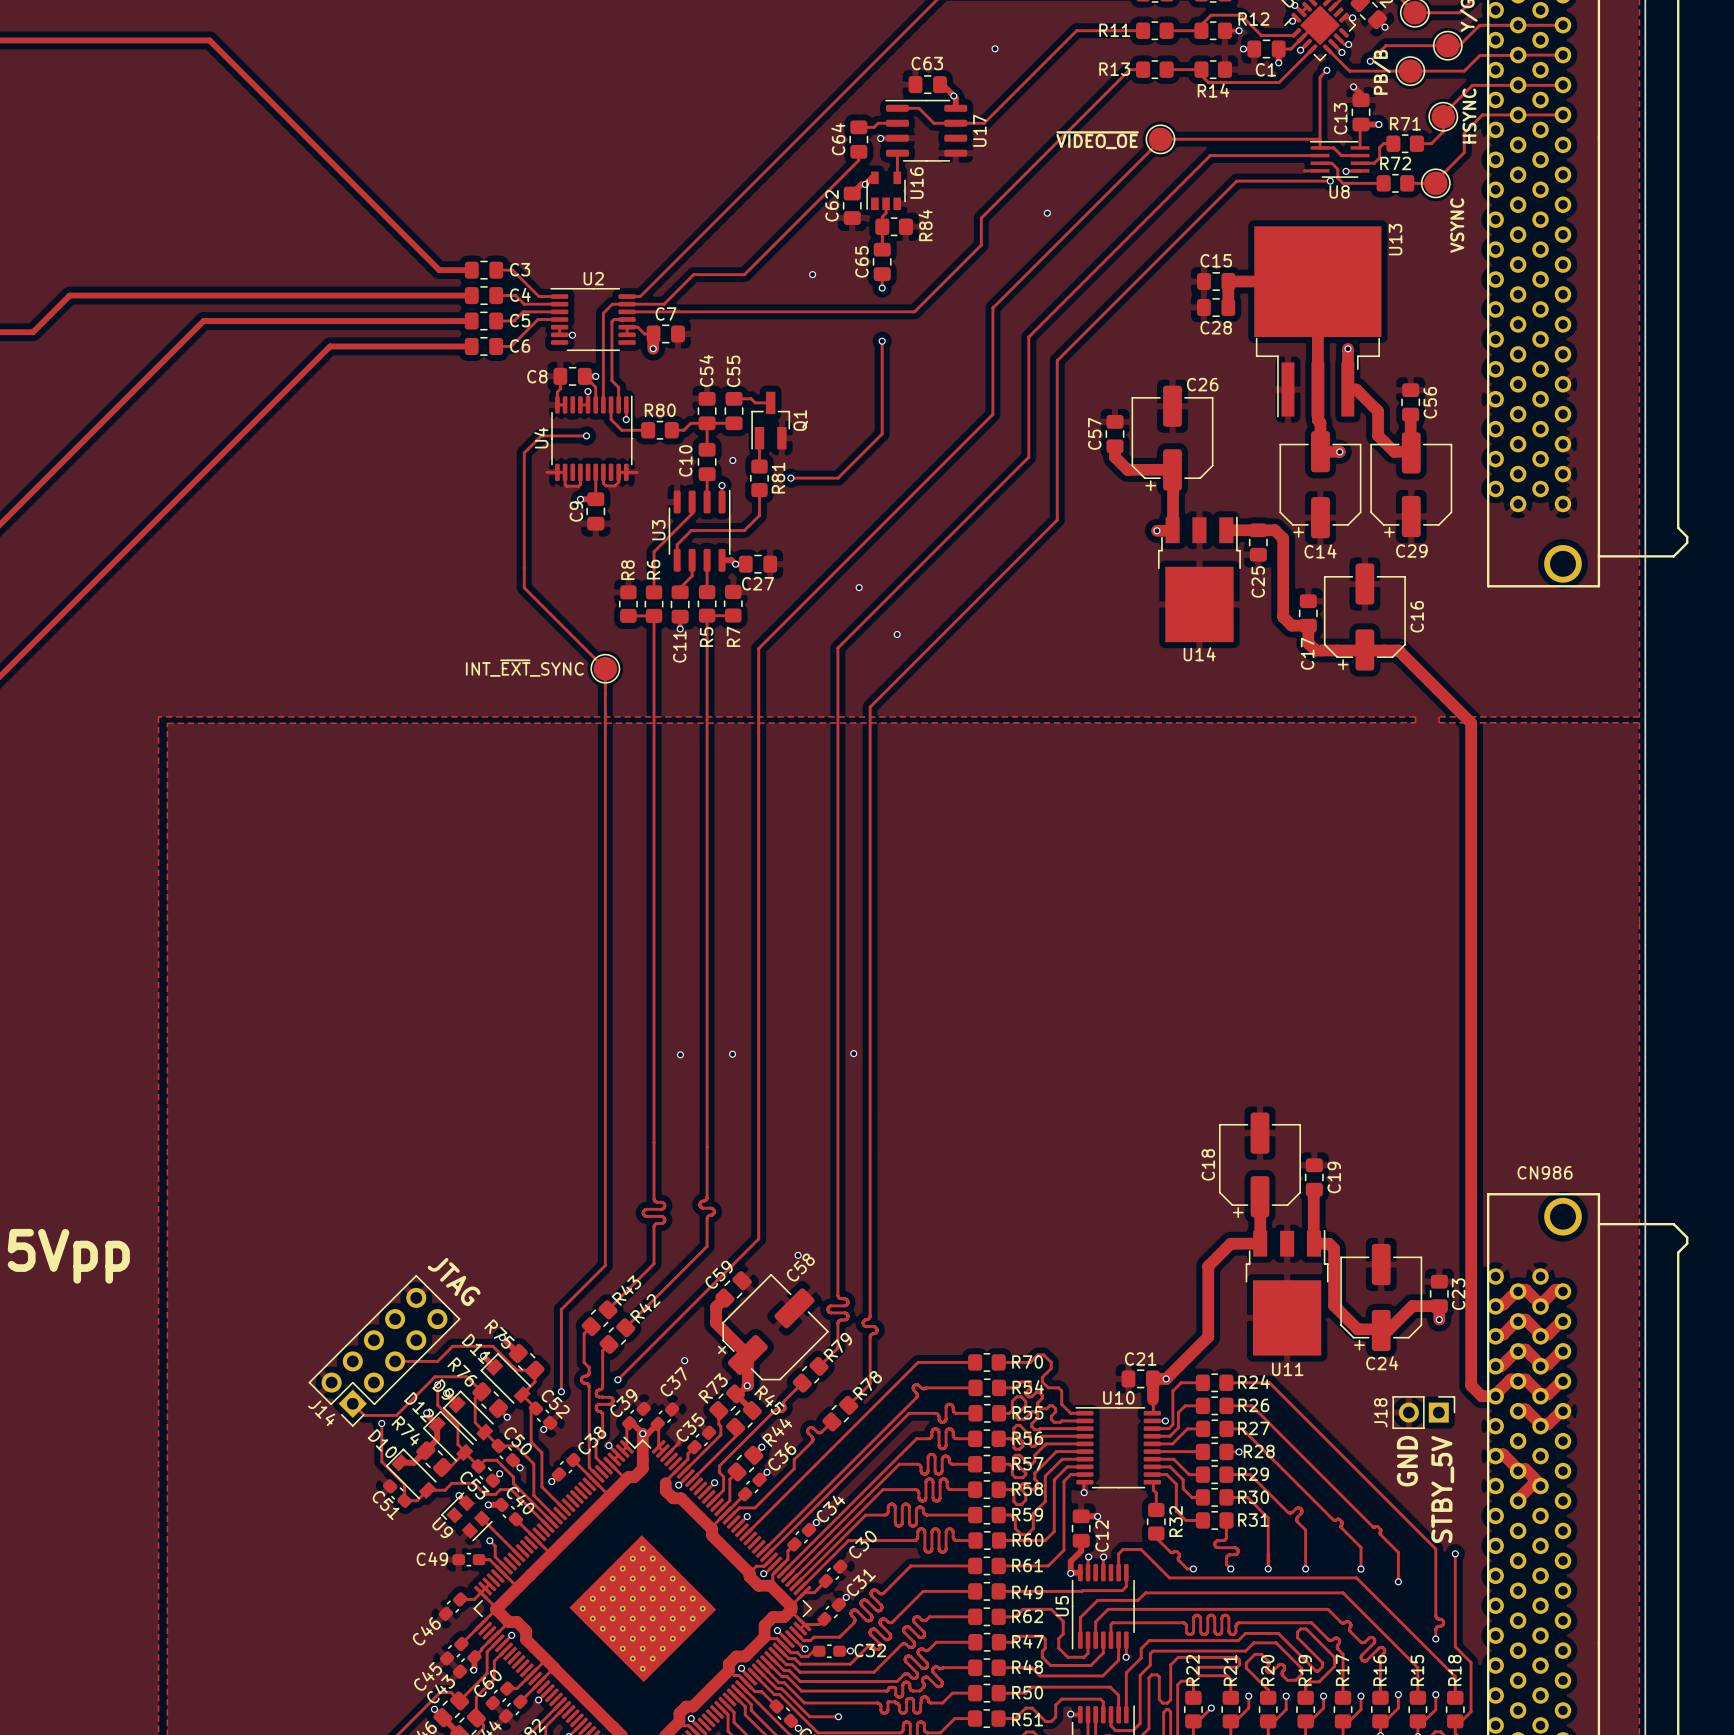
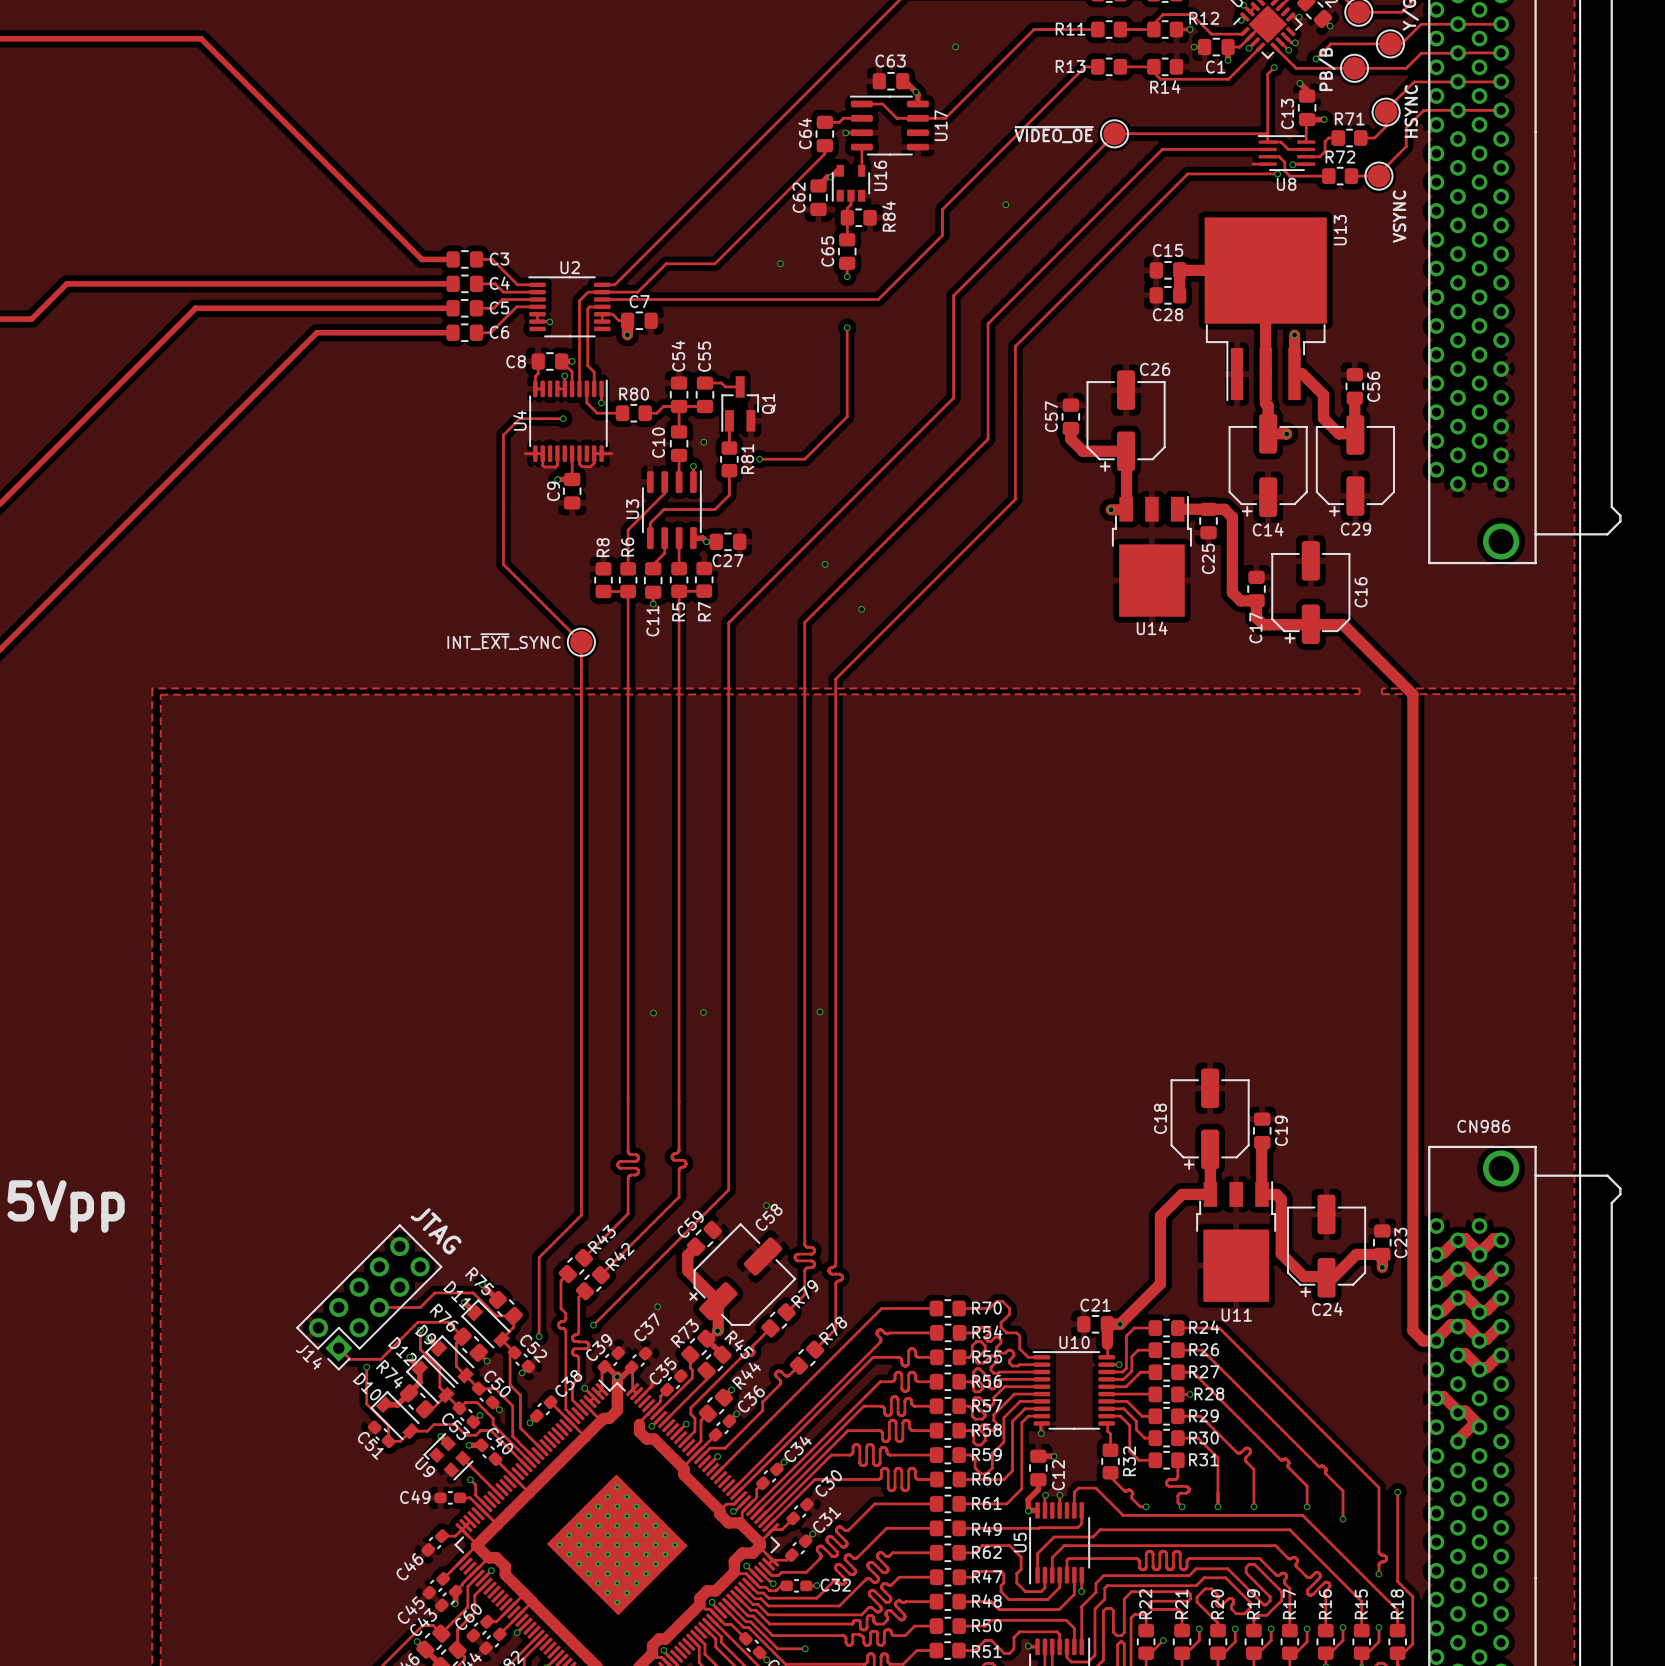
J18: (1423, 1412) -> none
text: GND (1407, 1461) -> none
text: STBY_5V (1442, 1489) -> none

